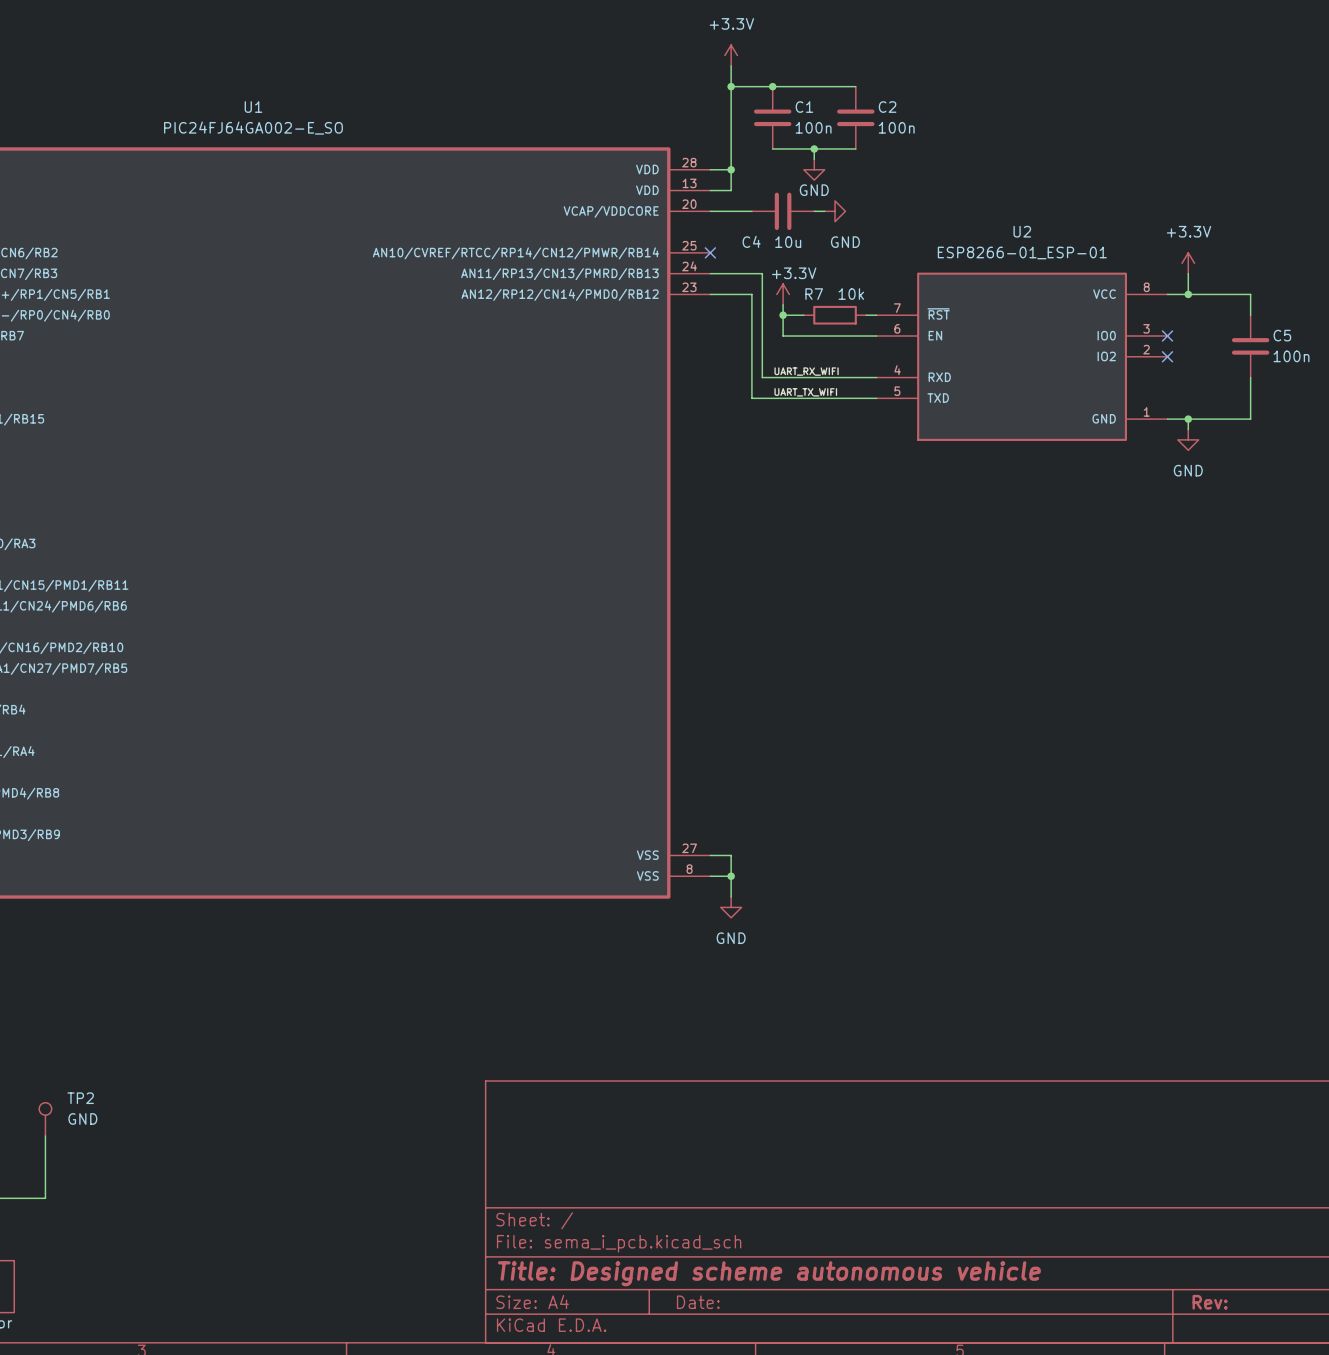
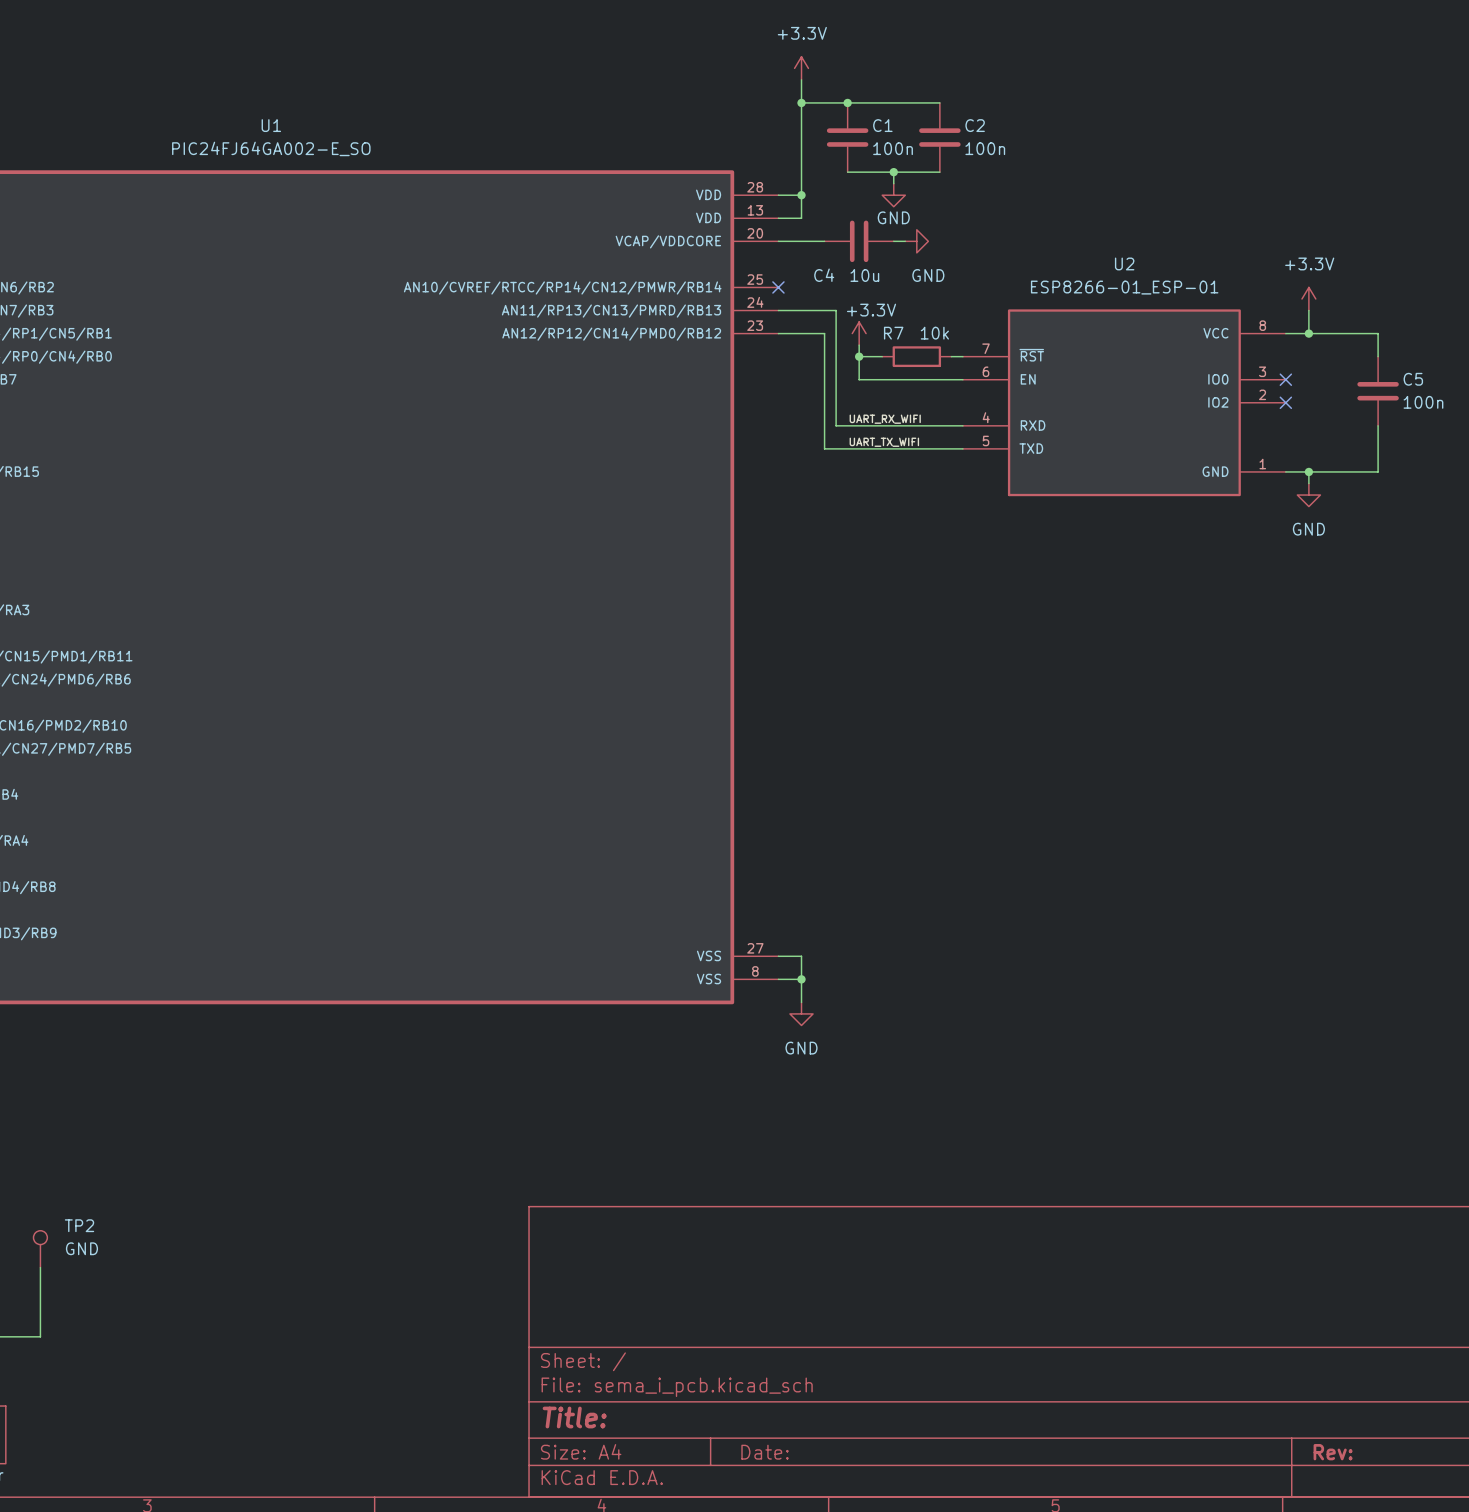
title block: Title: Designed scheme autonomous vehicle (769, 1273) -> Title: (574, 1417)

